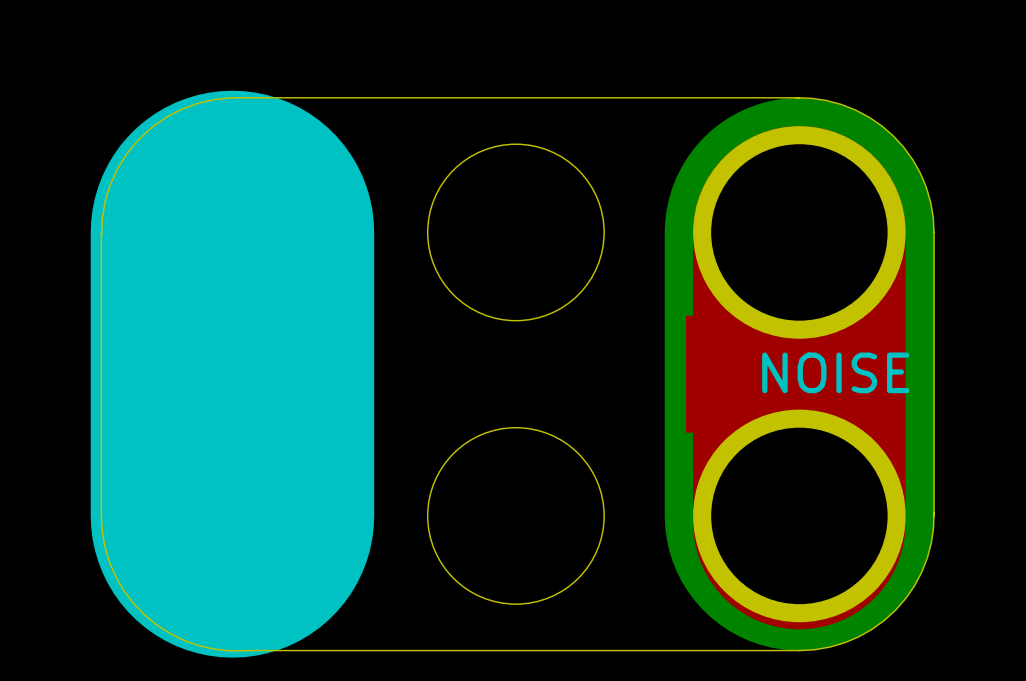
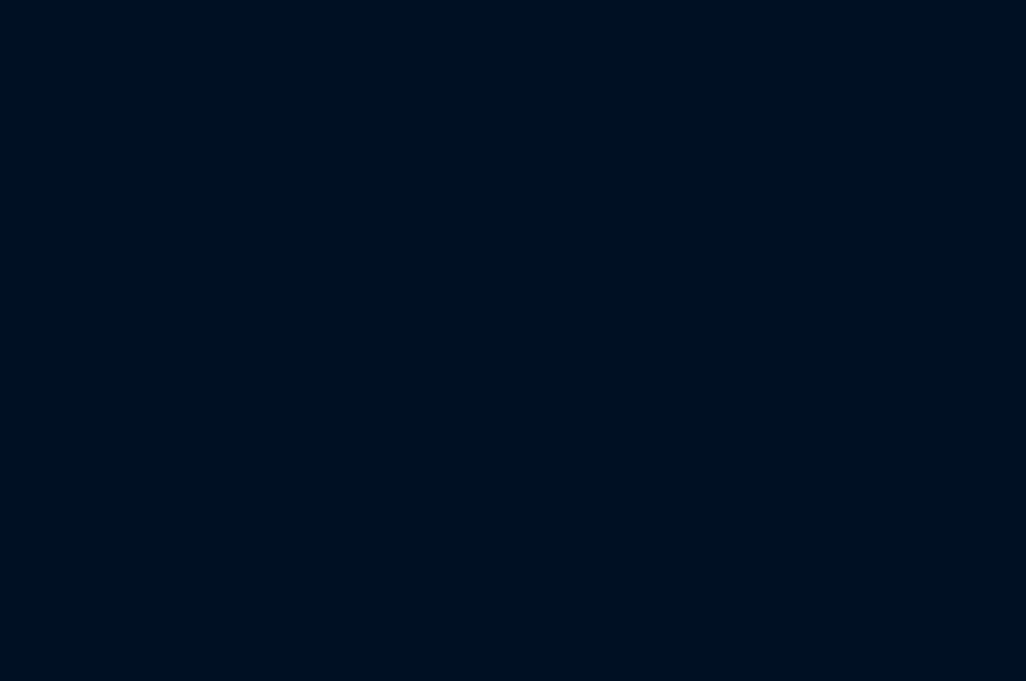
part: (512, 374) -> none

